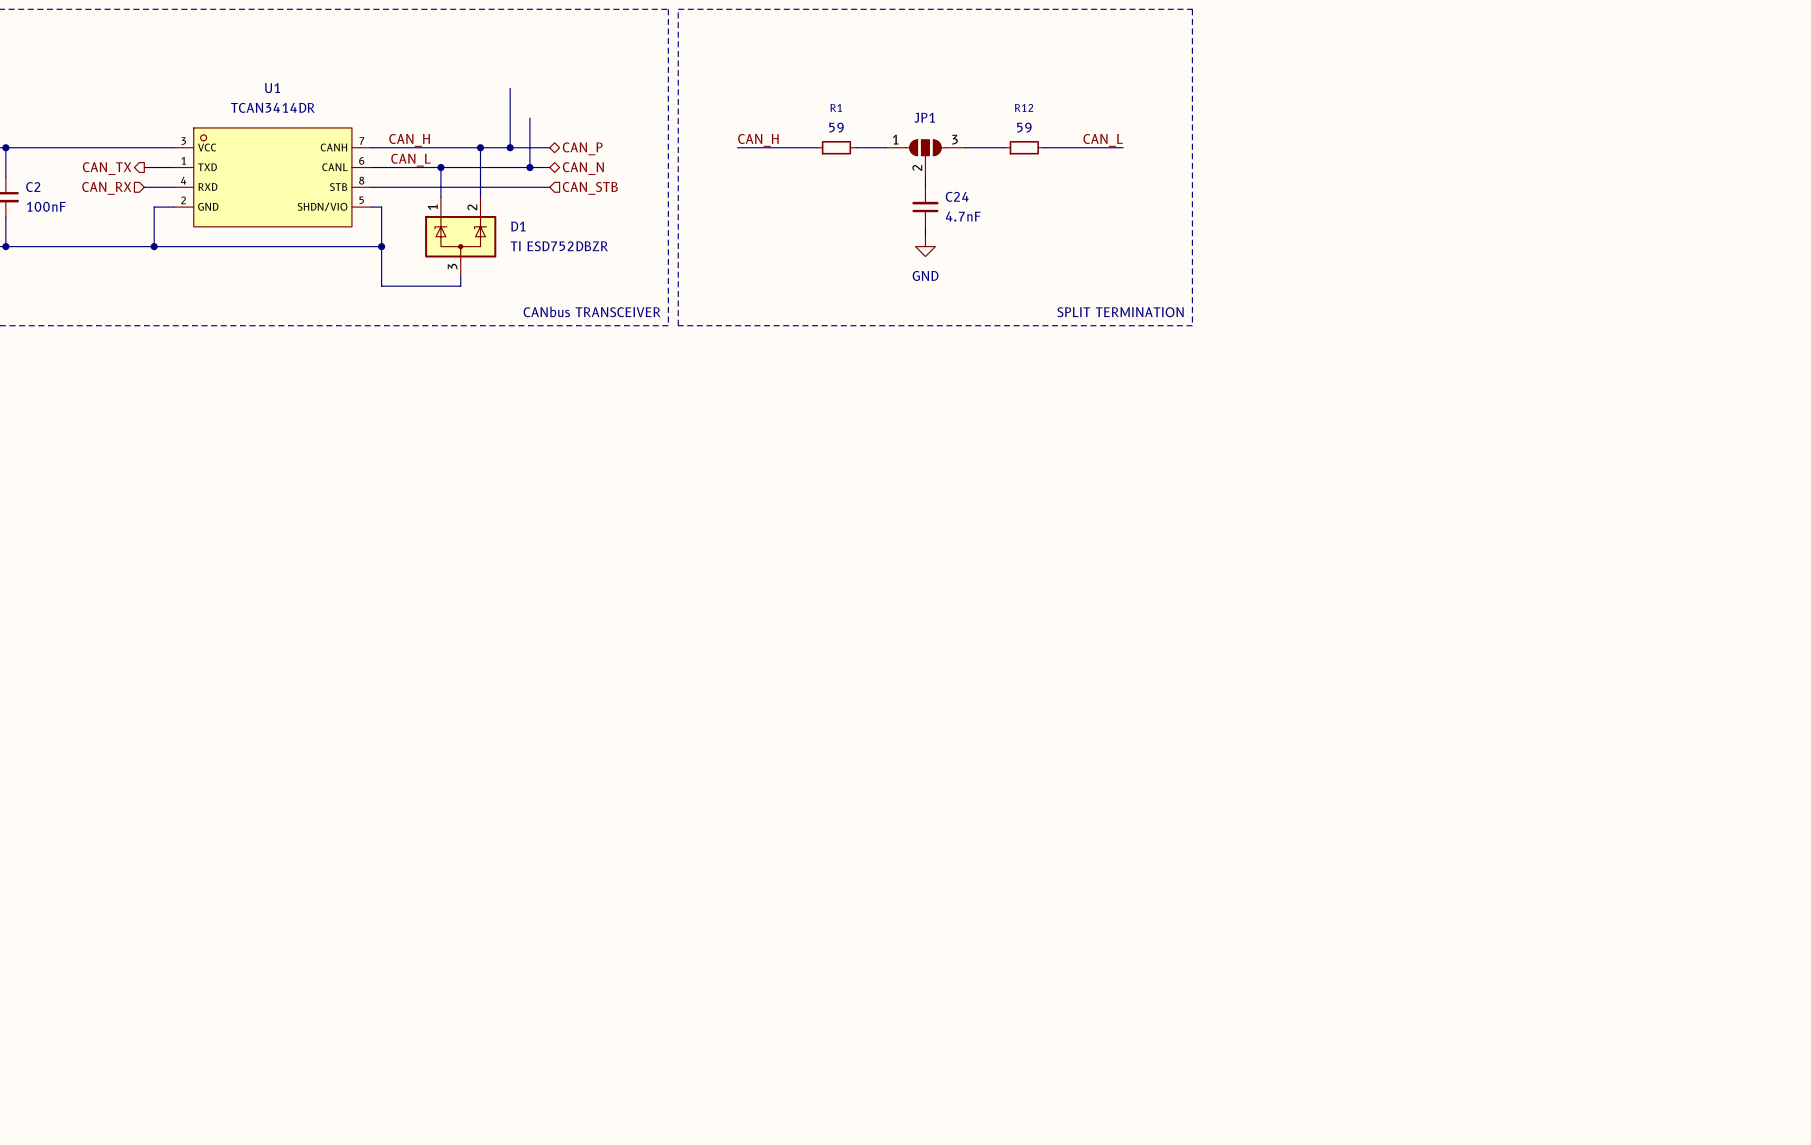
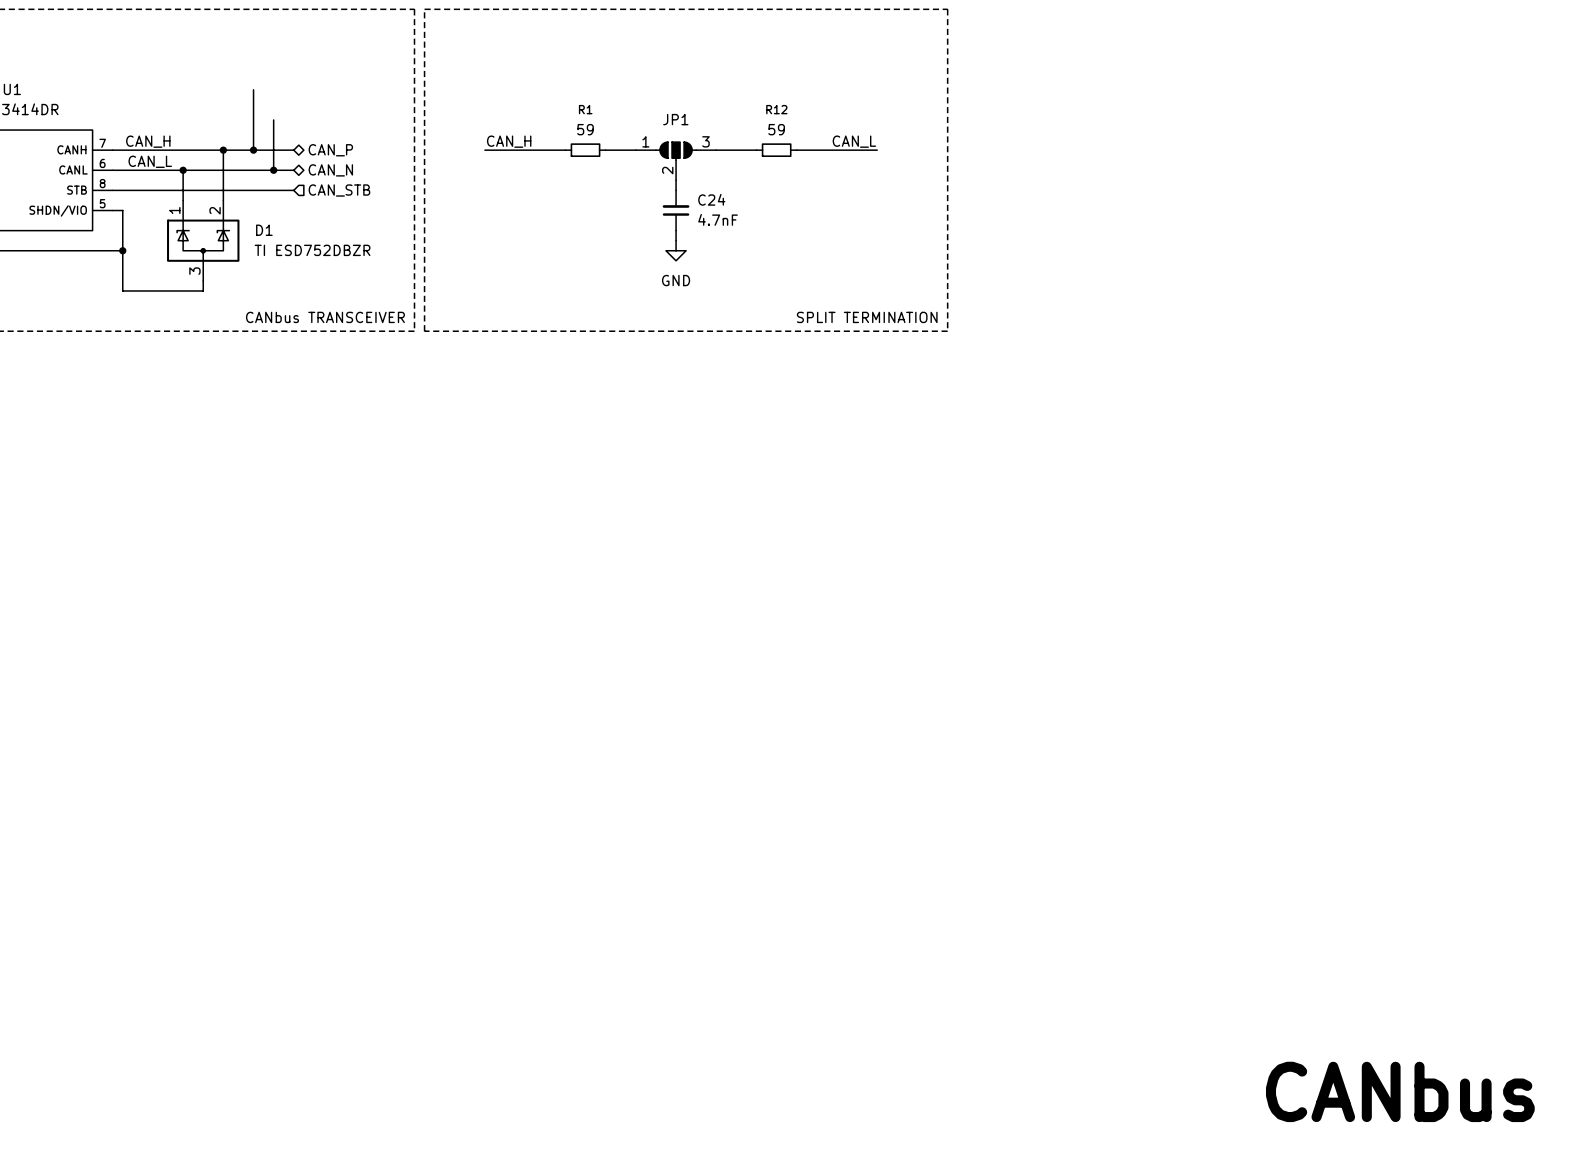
text: none -> CANbus (1400, 1091)

